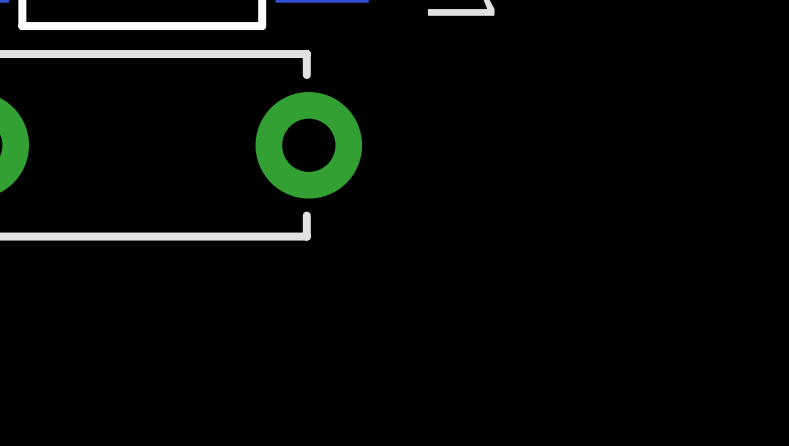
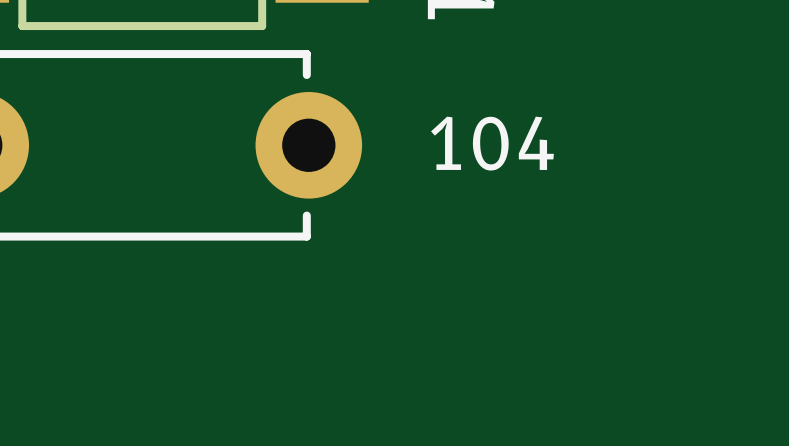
part value: none -> 104 (492, 143)

